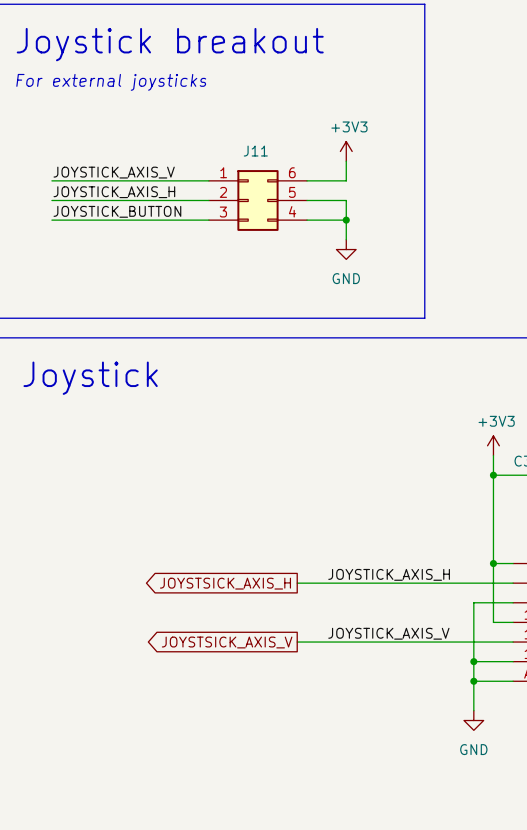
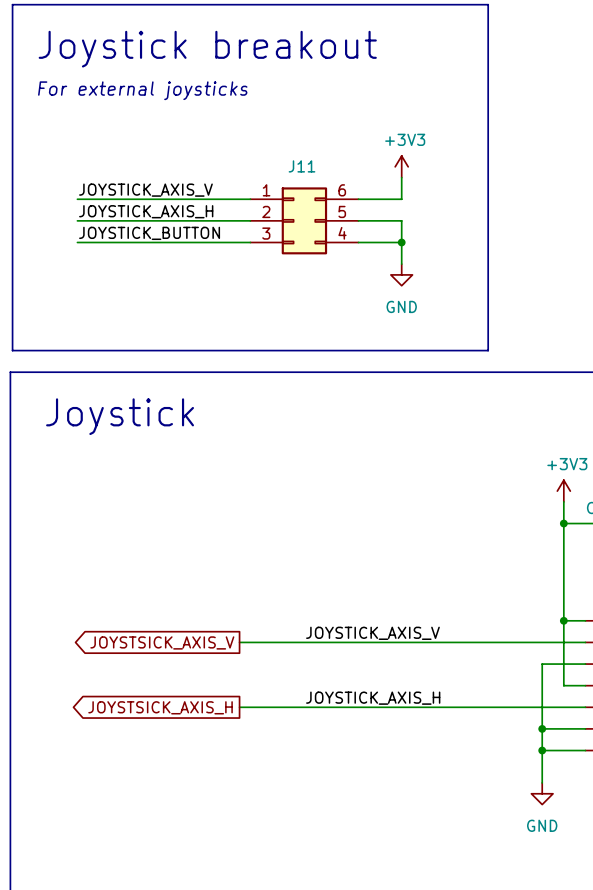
label position: JOYSTICK_AXIS_H (389, 574) -> JOYSTICK_AXIS_H (373, 698)
wire: none -> (239, 642) (347, 642)
global label position: JOYSTSICK_AXIS_H (225, 583) -> JOYSTSICK_AXIS_H (160, 707)
label position: JOYSTICK_AXIS_V (388, 633) -> JOYSTICK_AXIS_V (372, 633)
wire: none -> (239, 707) (347, 707)
global label position: JOYSTSICK_AXIS_V (227, 642) -> JOYSTSICK_AXIS_V (162, 642)

